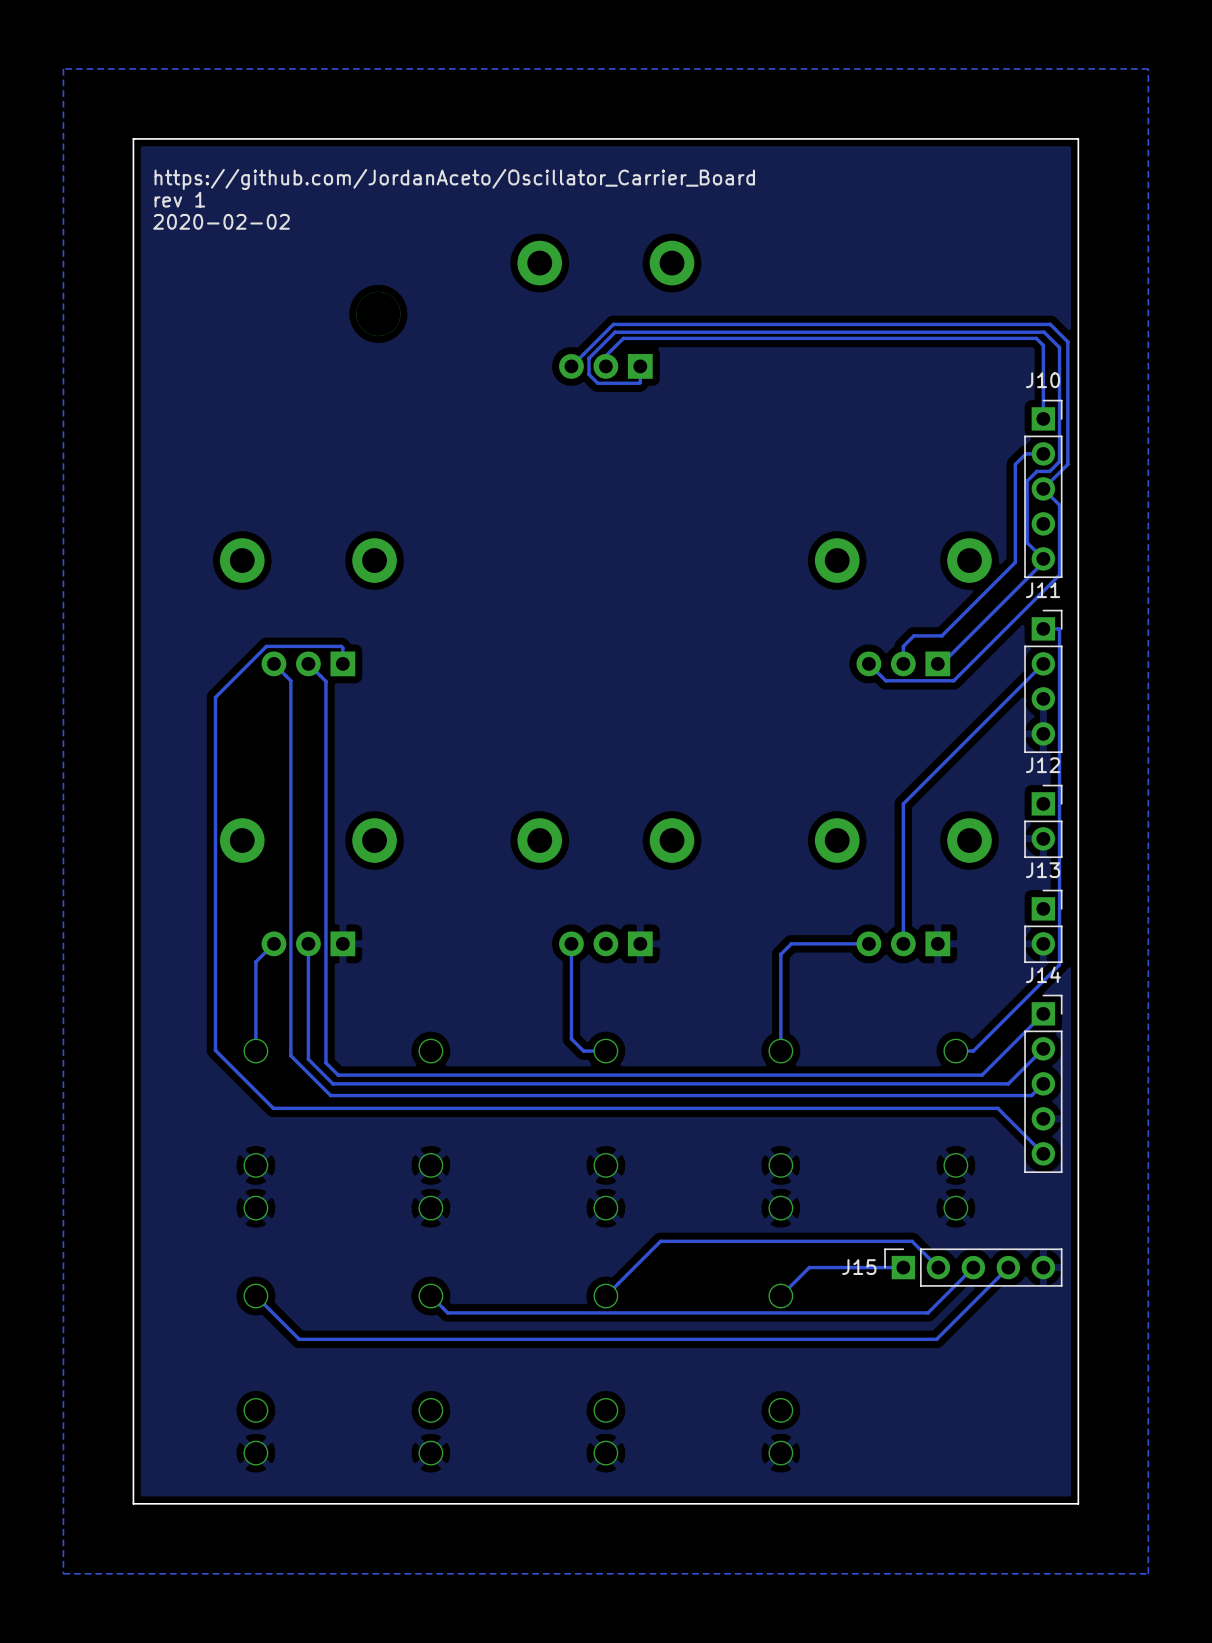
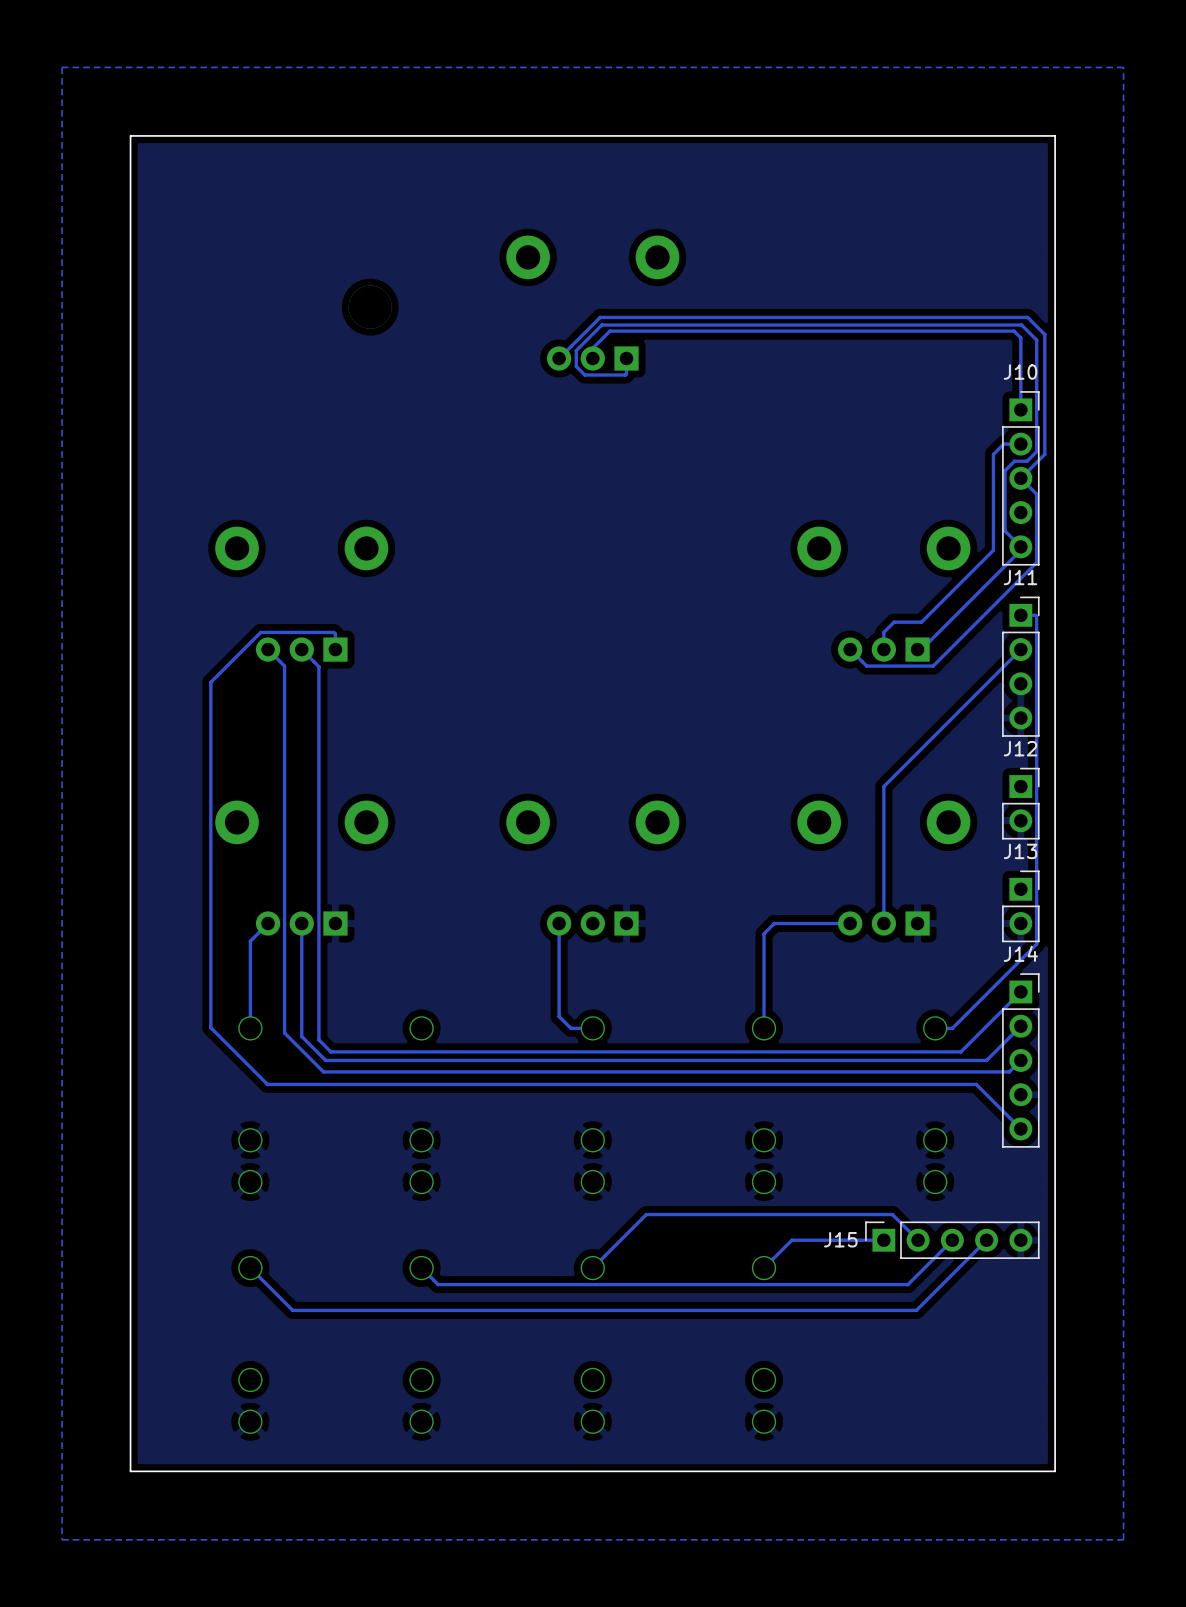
text: https://github.com/JordanAceto/Oscillator_Carrier_Board (454, 179) -> none
text: rev 1 (179, 199) -> none
text: 2020-02-02 (221, 221) -> none

